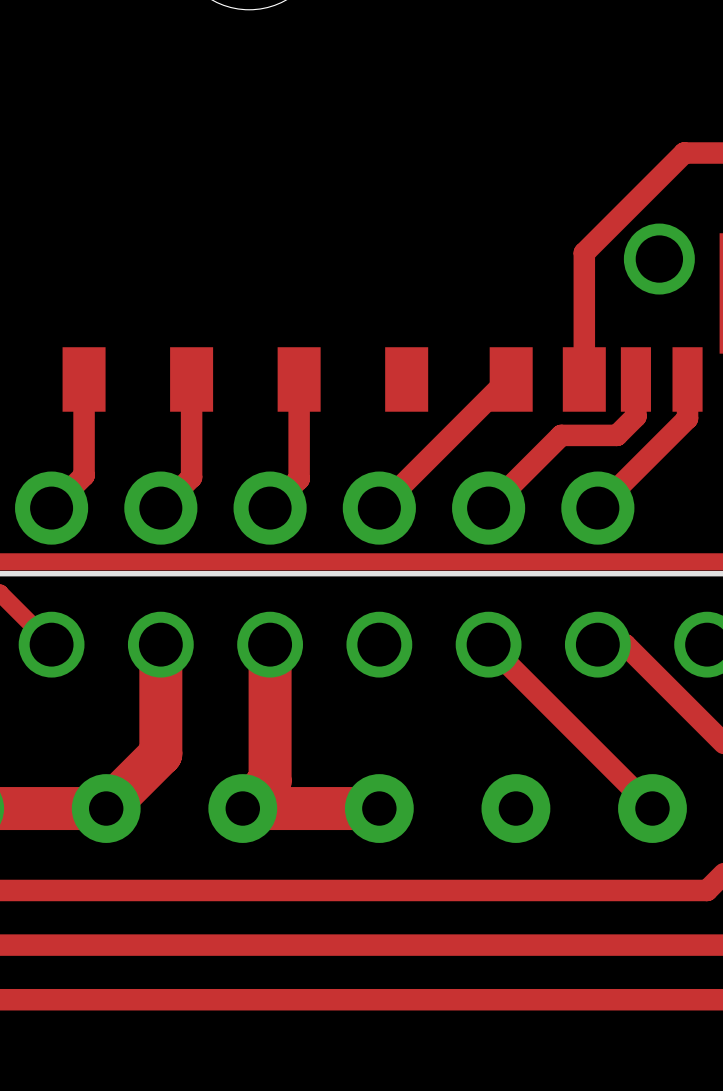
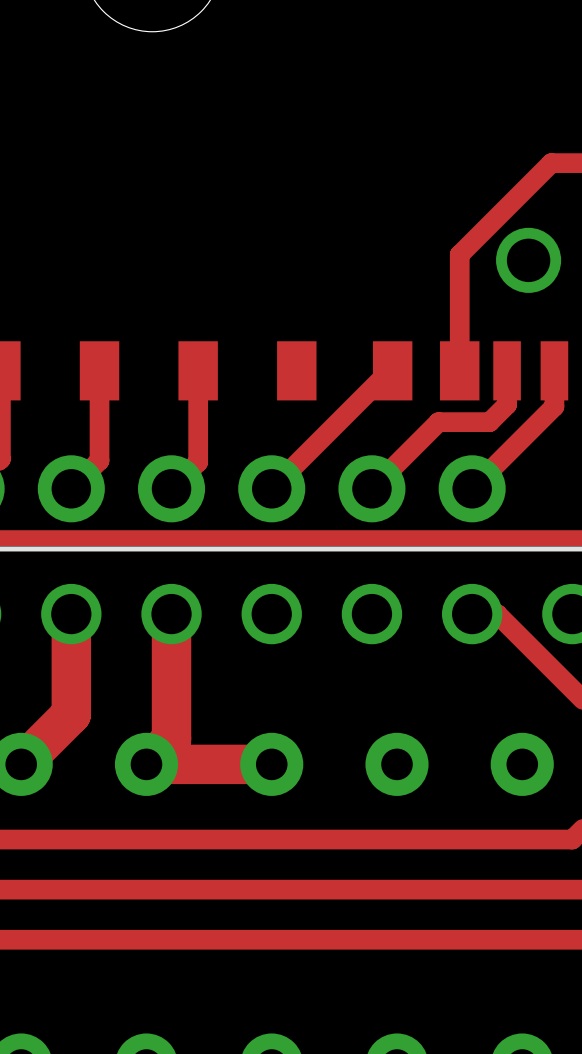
track: (488, 644) (652, 808) -> none

